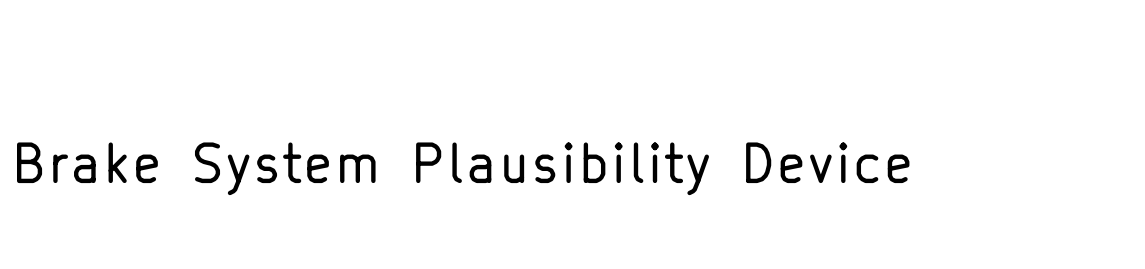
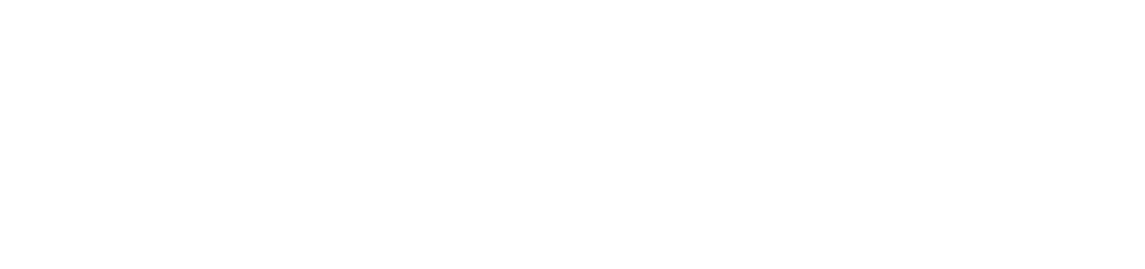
text: Brake System Plausibility Device (463, 168) -> none

